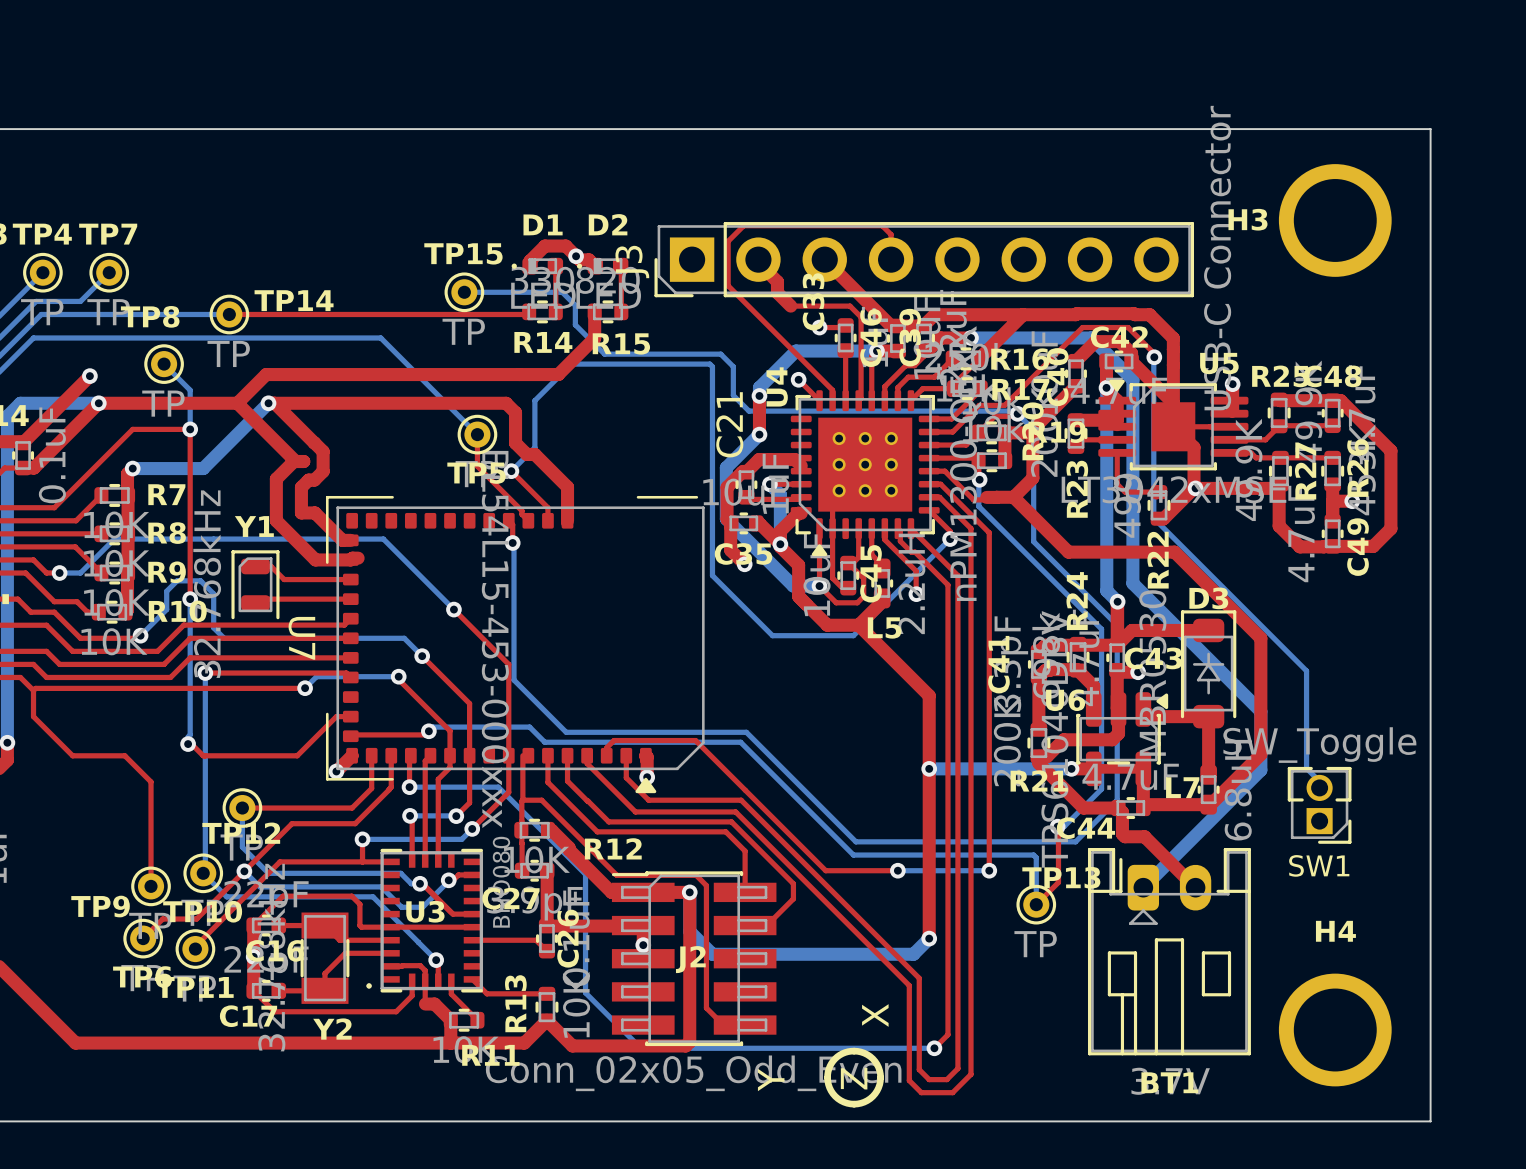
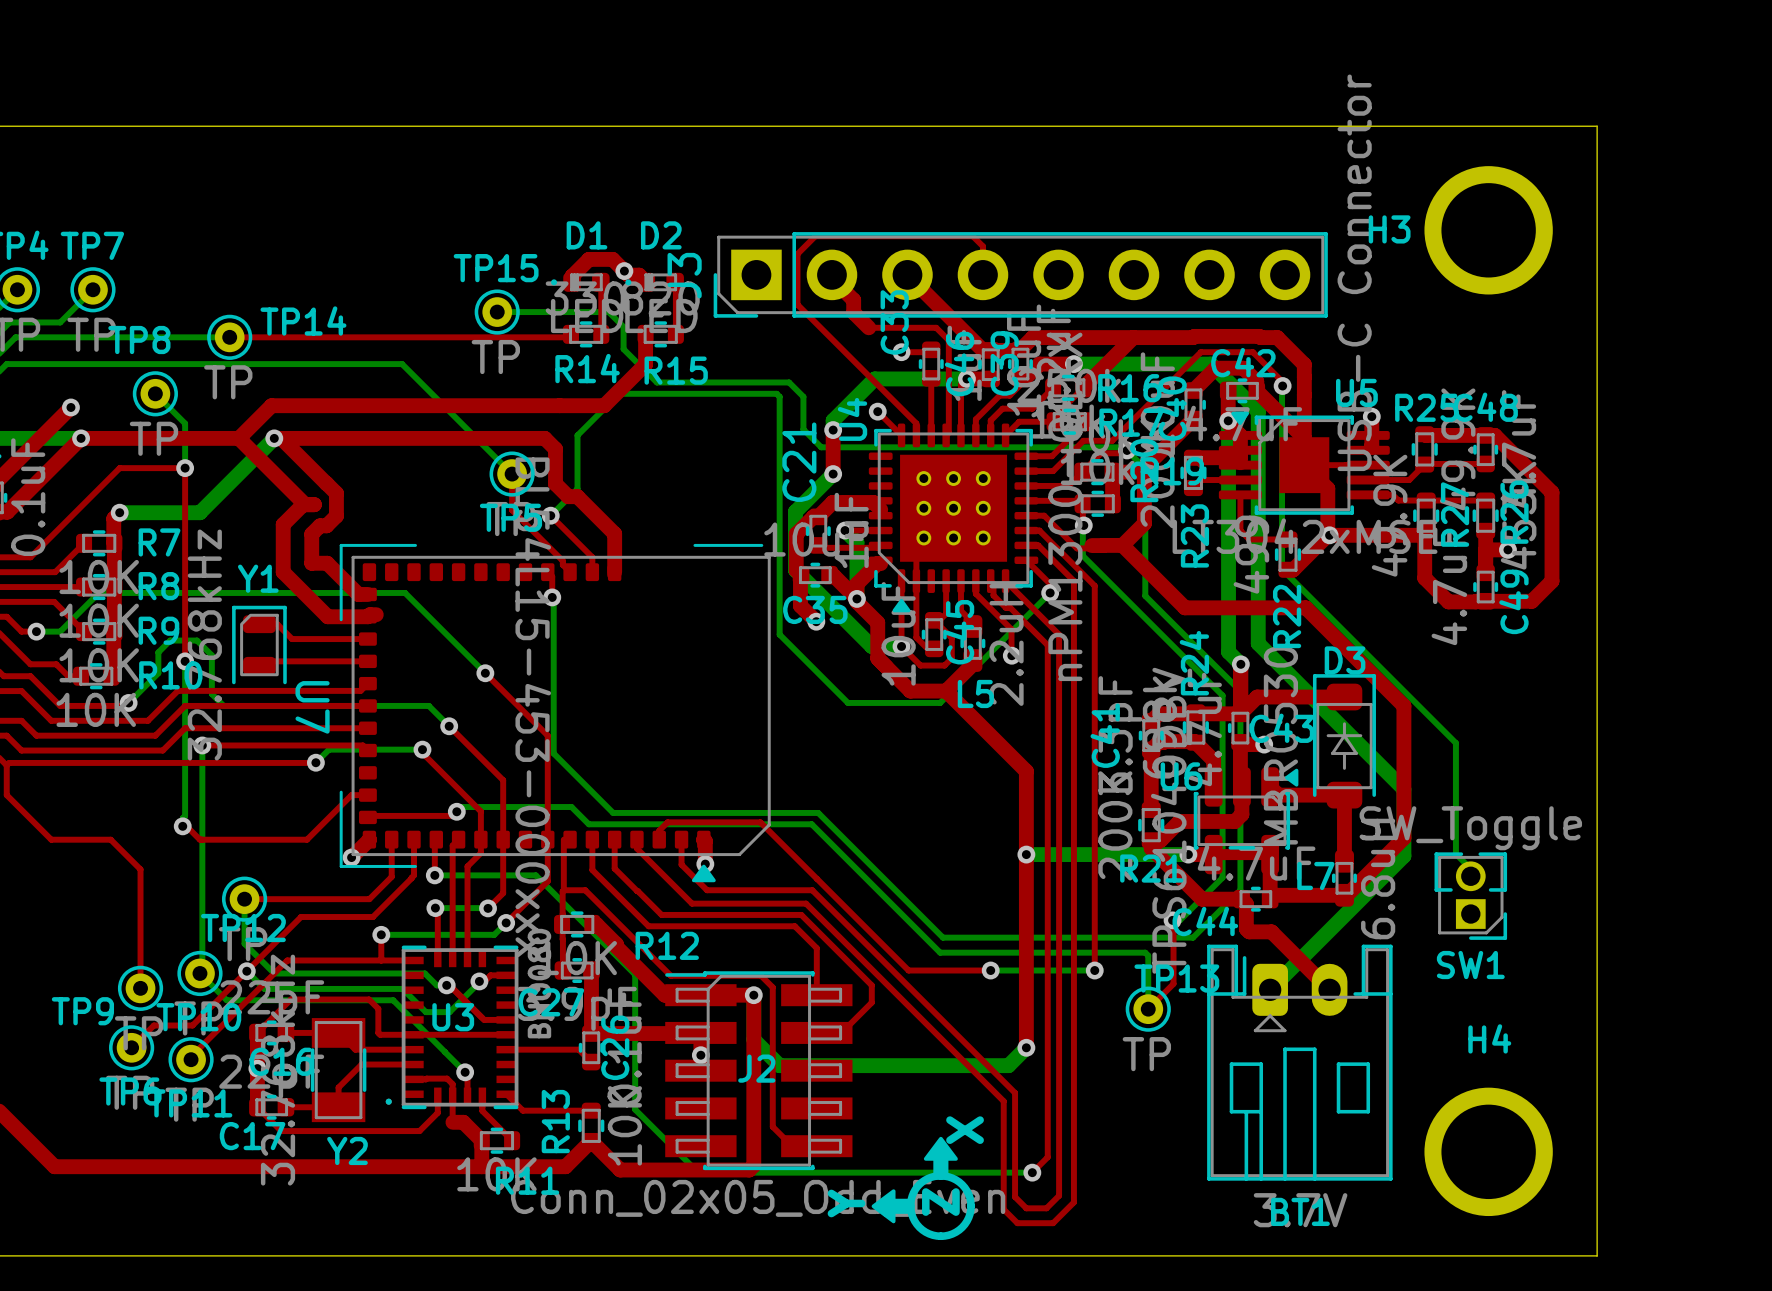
drawing: none -> [871, 1136, 958, 1224]

